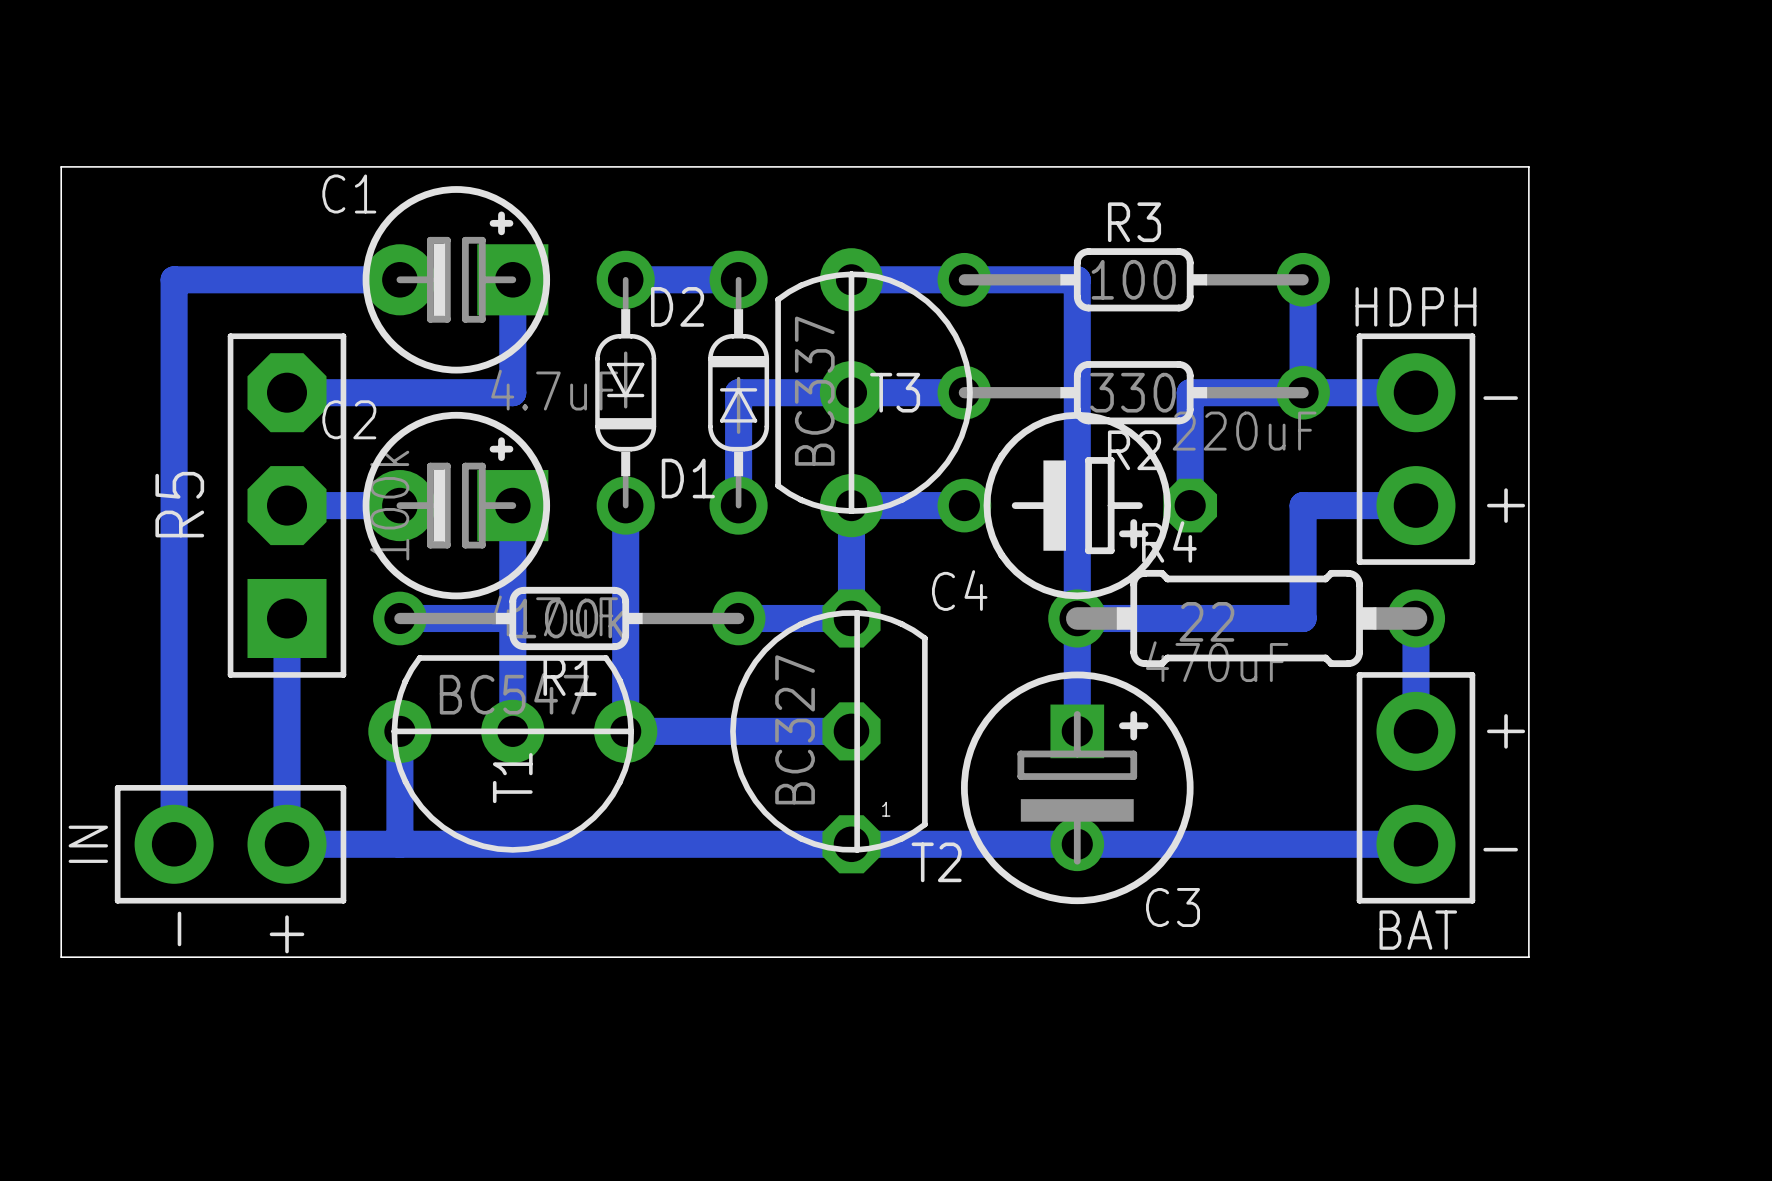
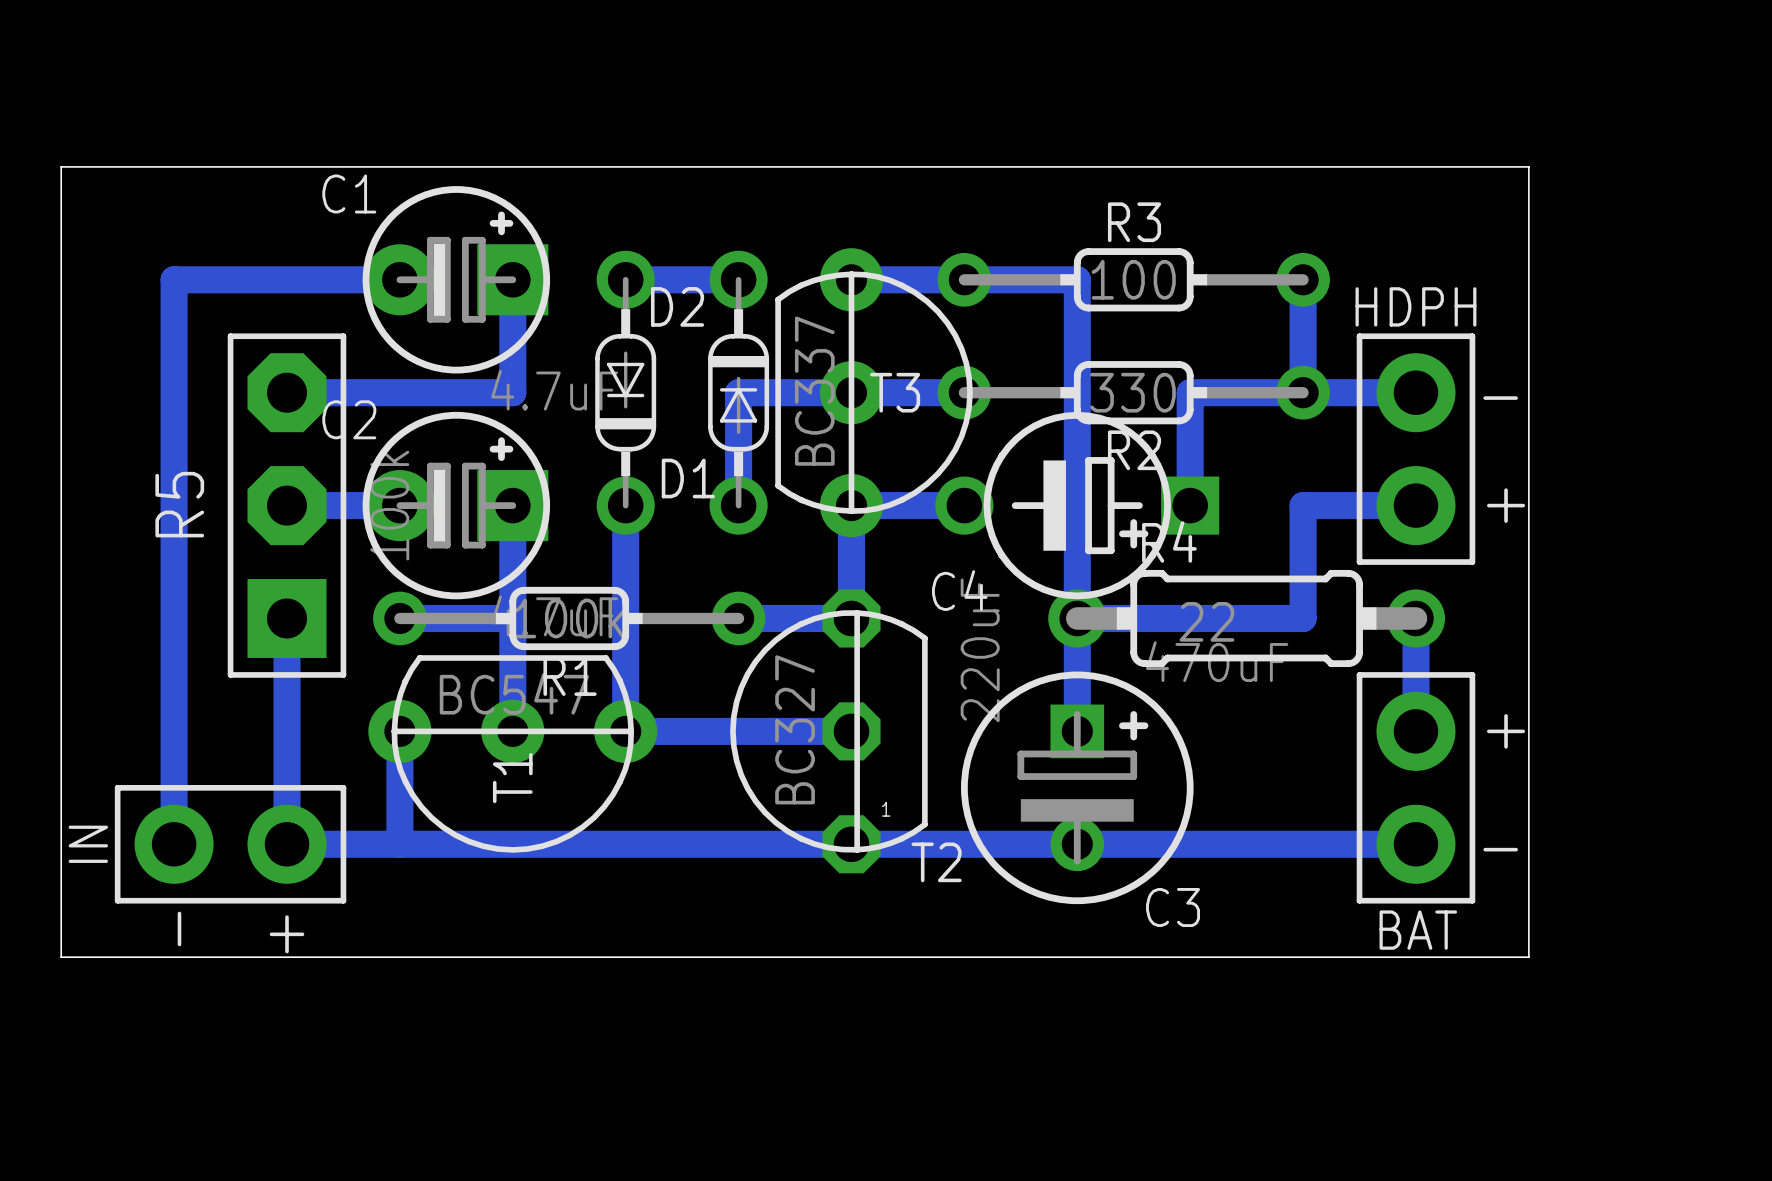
C4 footprint: [937, 411, 1218, 600] -> [935, 411, 1220, 600]
C4 value rotation: 0° (1244, 431) -> 90° counterclockwise (980, 650)
C4 value position: 220uF (1244, 431) -> 220uF (980, 650)

